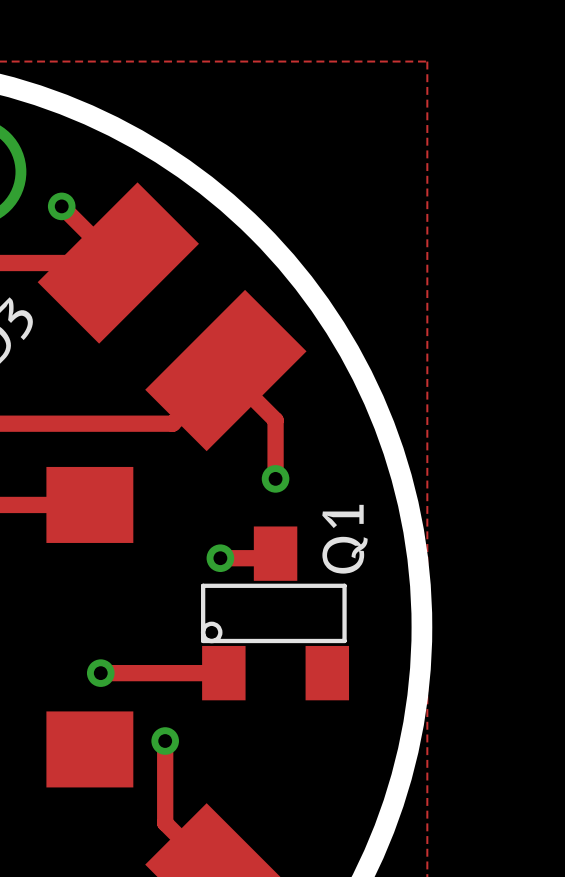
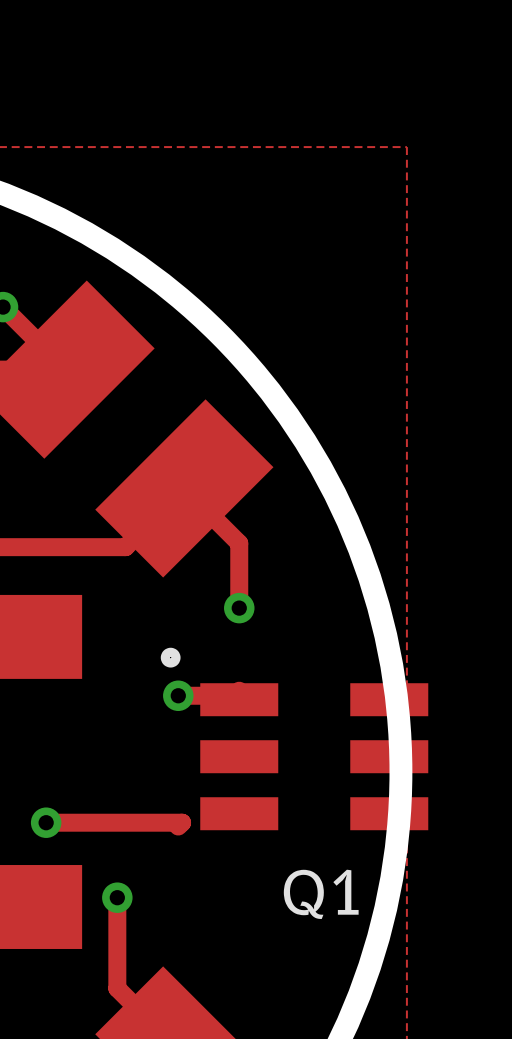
Q1 footprint: [200, 526, 350, 701] -> [160, 647, 429, 831]
Q1 name position: Q1 (344, 539) -> Q1 (321, 894)

